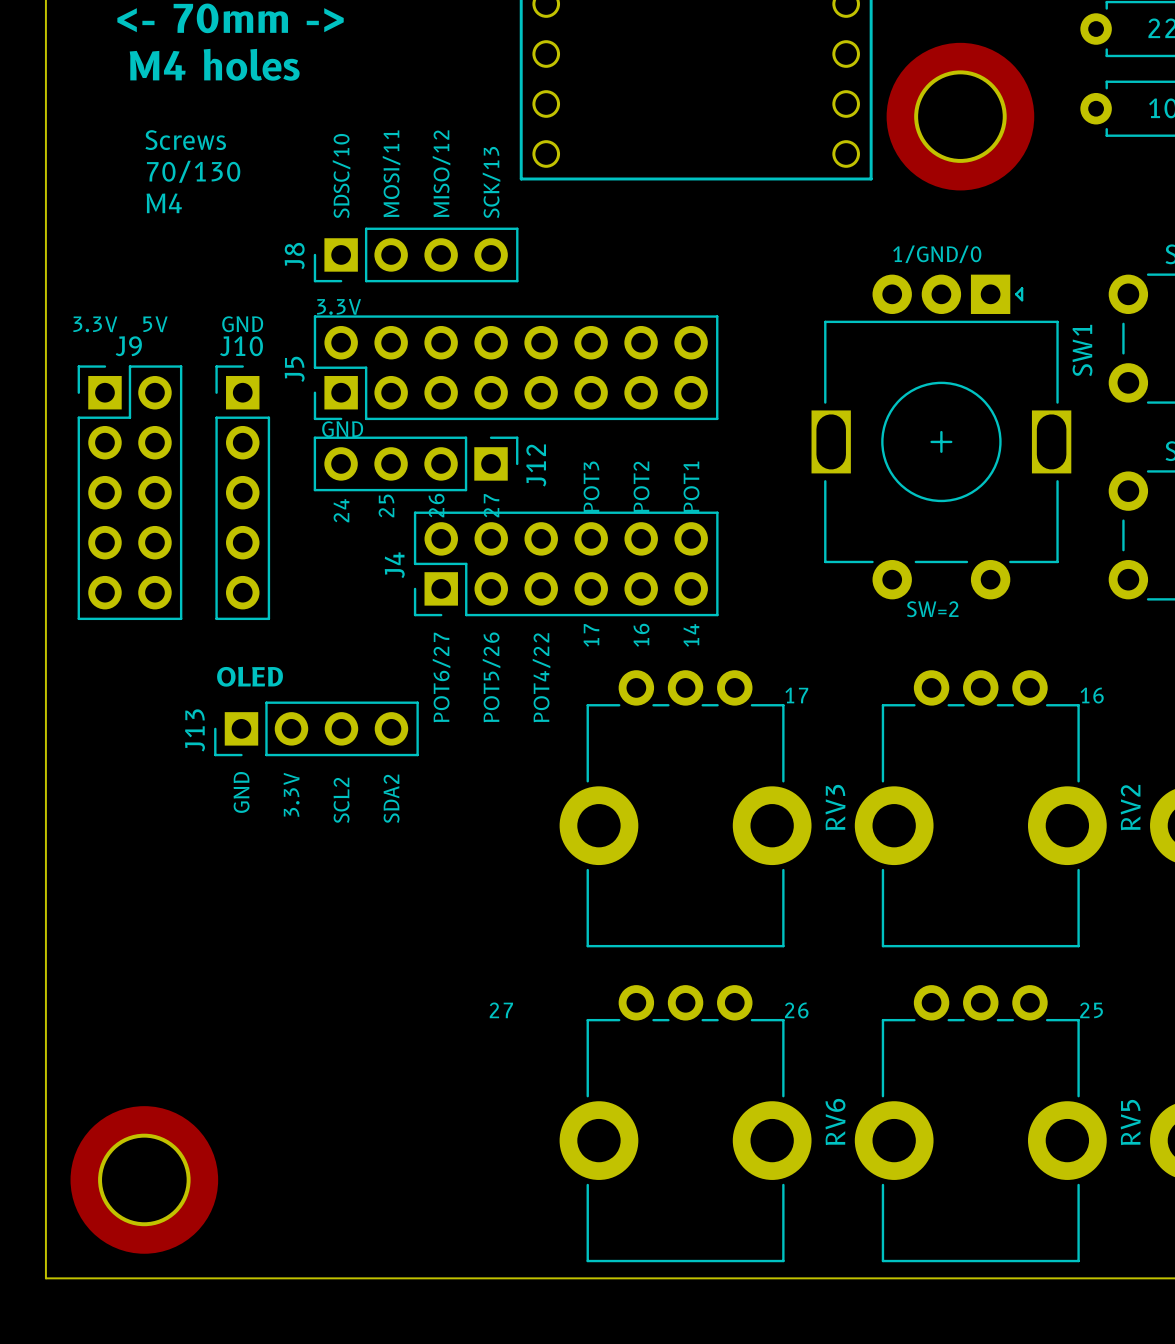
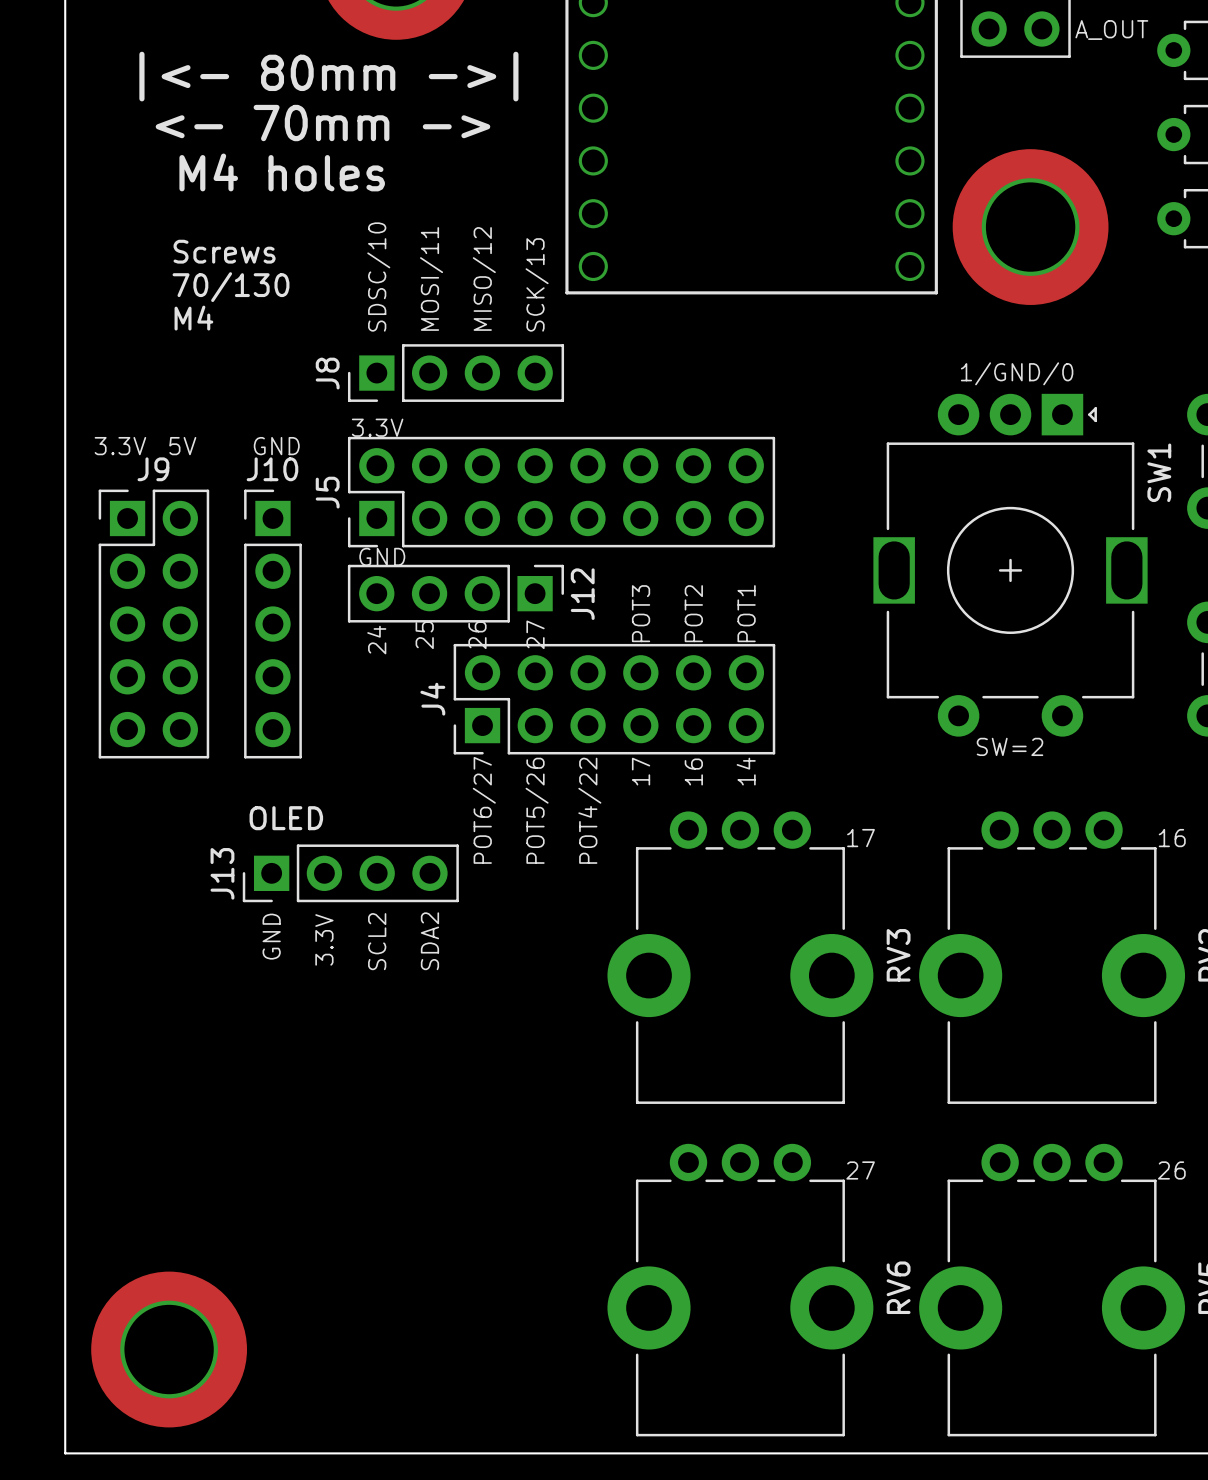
text: 27 (501, 1010) -> none
text: 26 (796, 1010) -> 27 (860, 1170)
text: 25 (1091, 1010) -> 26 (1171, 1170)

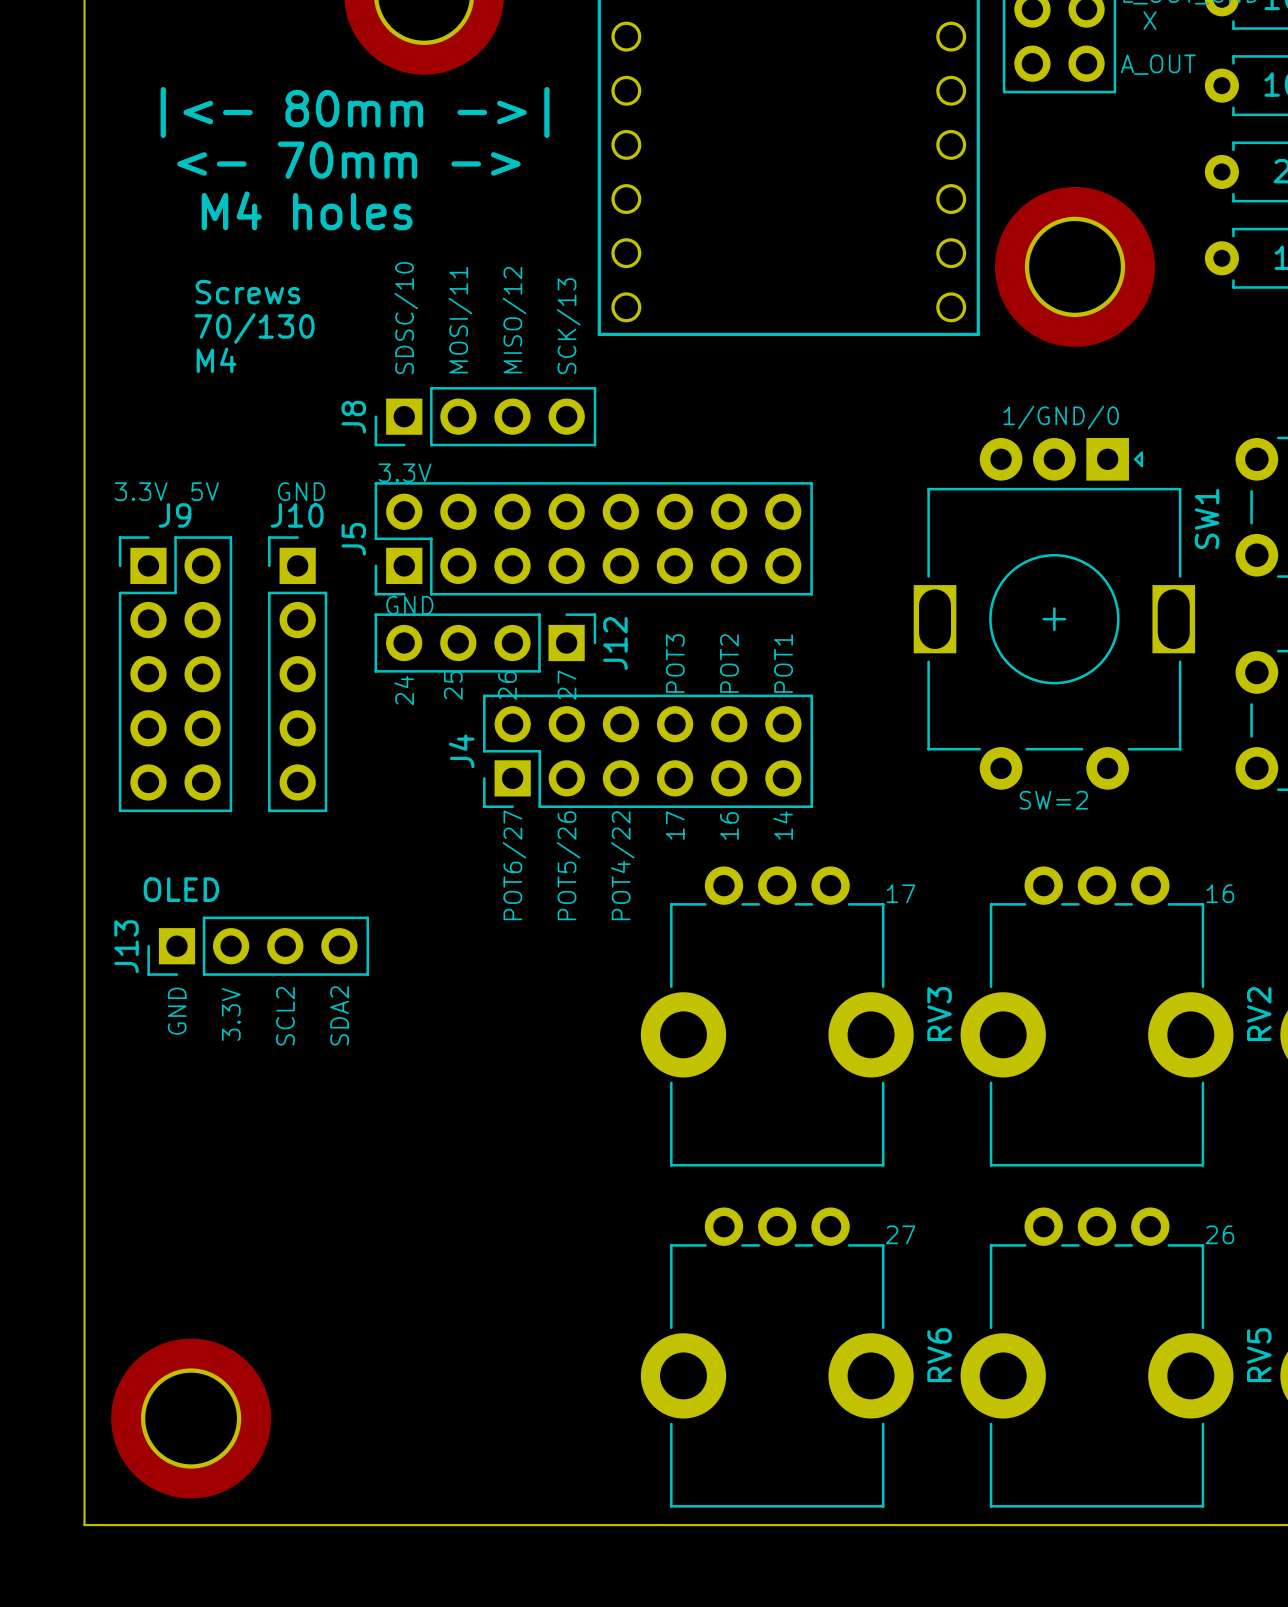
text position: OLED (286, 818) -> OLED (181, 889)
J13 position: (350, 873) -> (258, 946)
text position: GND (271, 936) -> GND (177, 1011)
text position: 3.3V (324, 939) -> 3.3V (231, 1014)
text position: SCL2 (377, 941) -> SCL2 (285, 1016)
text position: SDA2 (429, 941) -> SDA2 (339, 1015)

